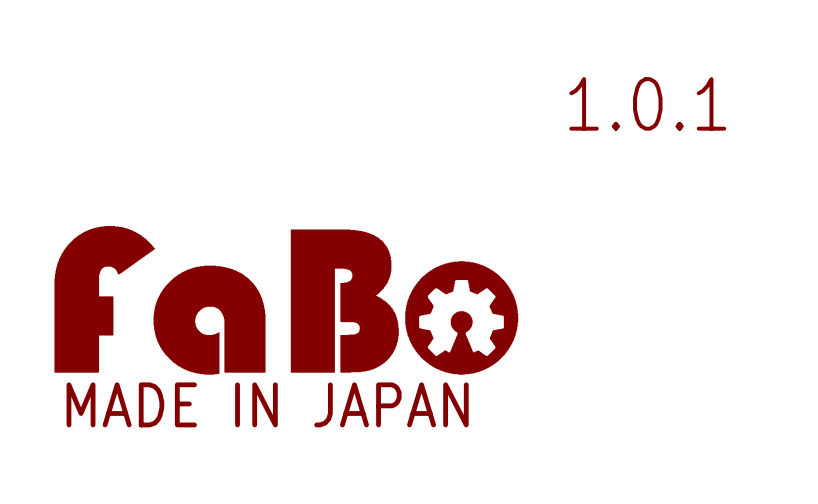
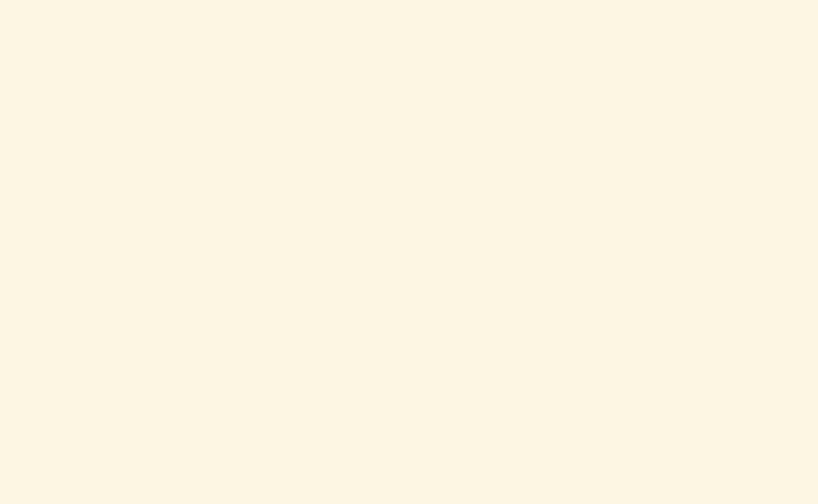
text: 1.0.1 (647, 103) -> none
part: (286, 300) -> none

